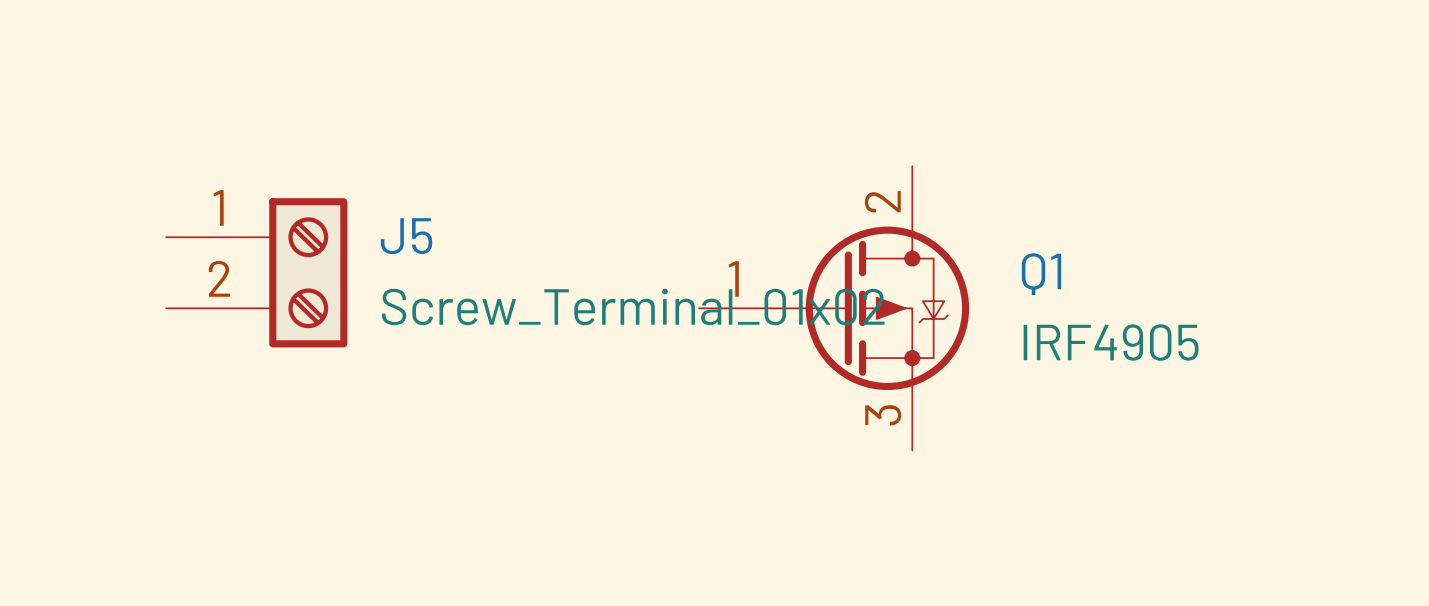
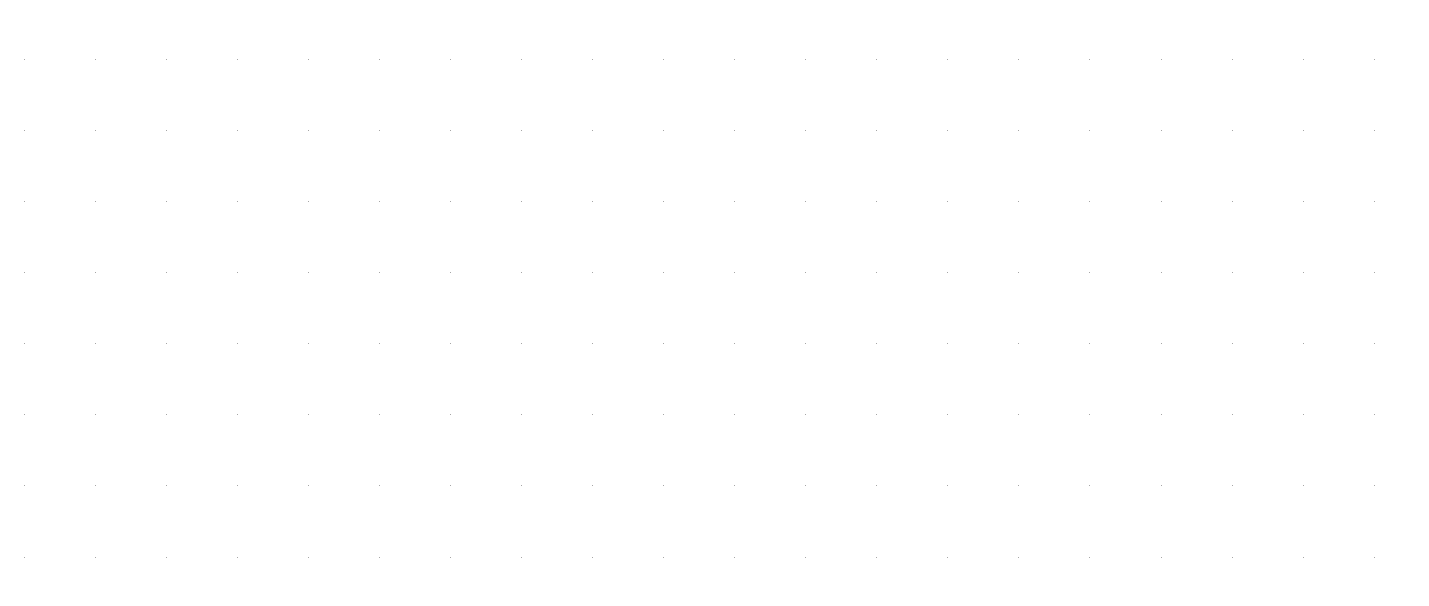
J5: Screw_Terminal_01x02 (256, 272) -> none
Q1: IRF4905 (834, 308) -> none

